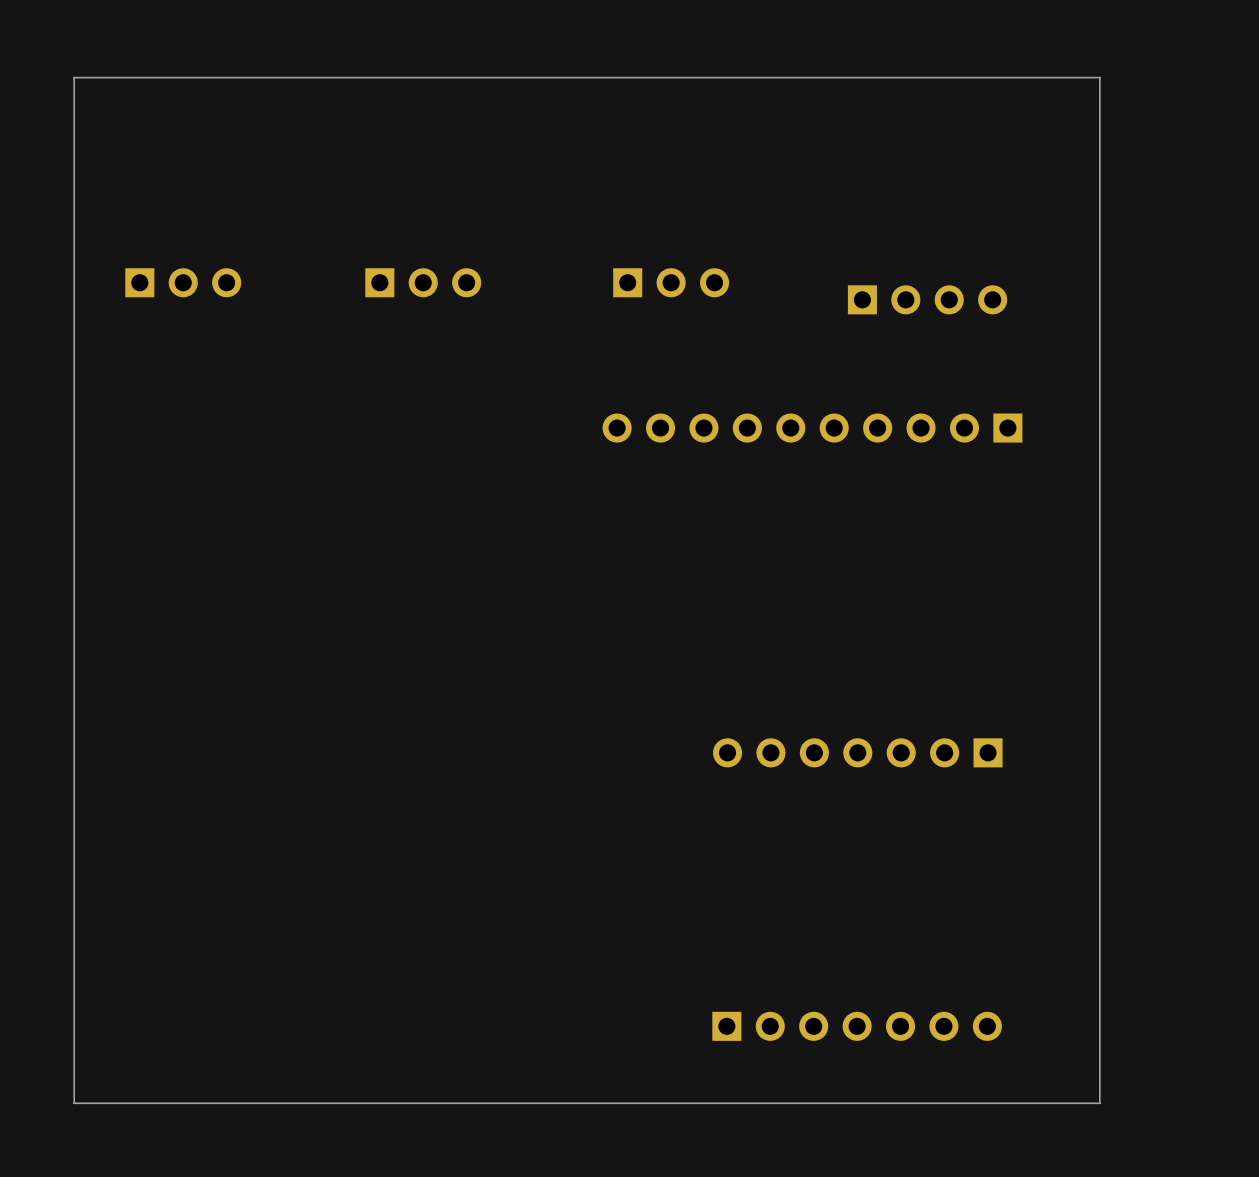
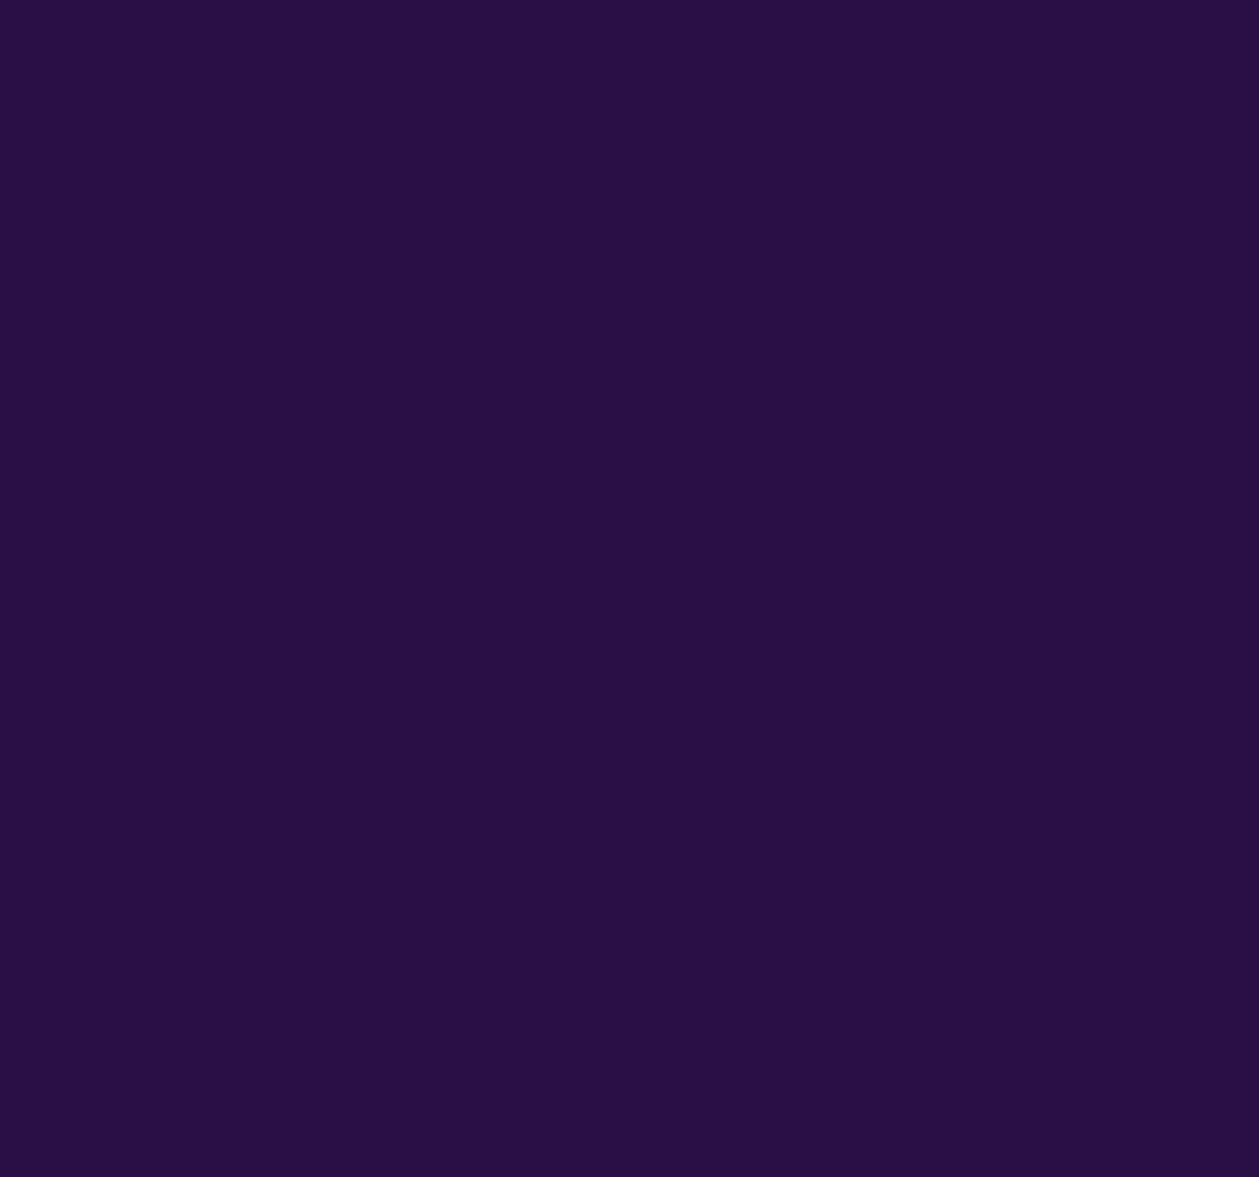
board edge: (1099, 77) (74, 77) (74, 1103) (1099, 1103) (1099, 77) -> none
part: (183, 282) -> none
part: (423, 282) -> none
part: (671, 282) -> none
part: (927, 299) -> none
part: (812, 428) -> none
part: (857, 752) -> none
part: (857, 1026) -> none

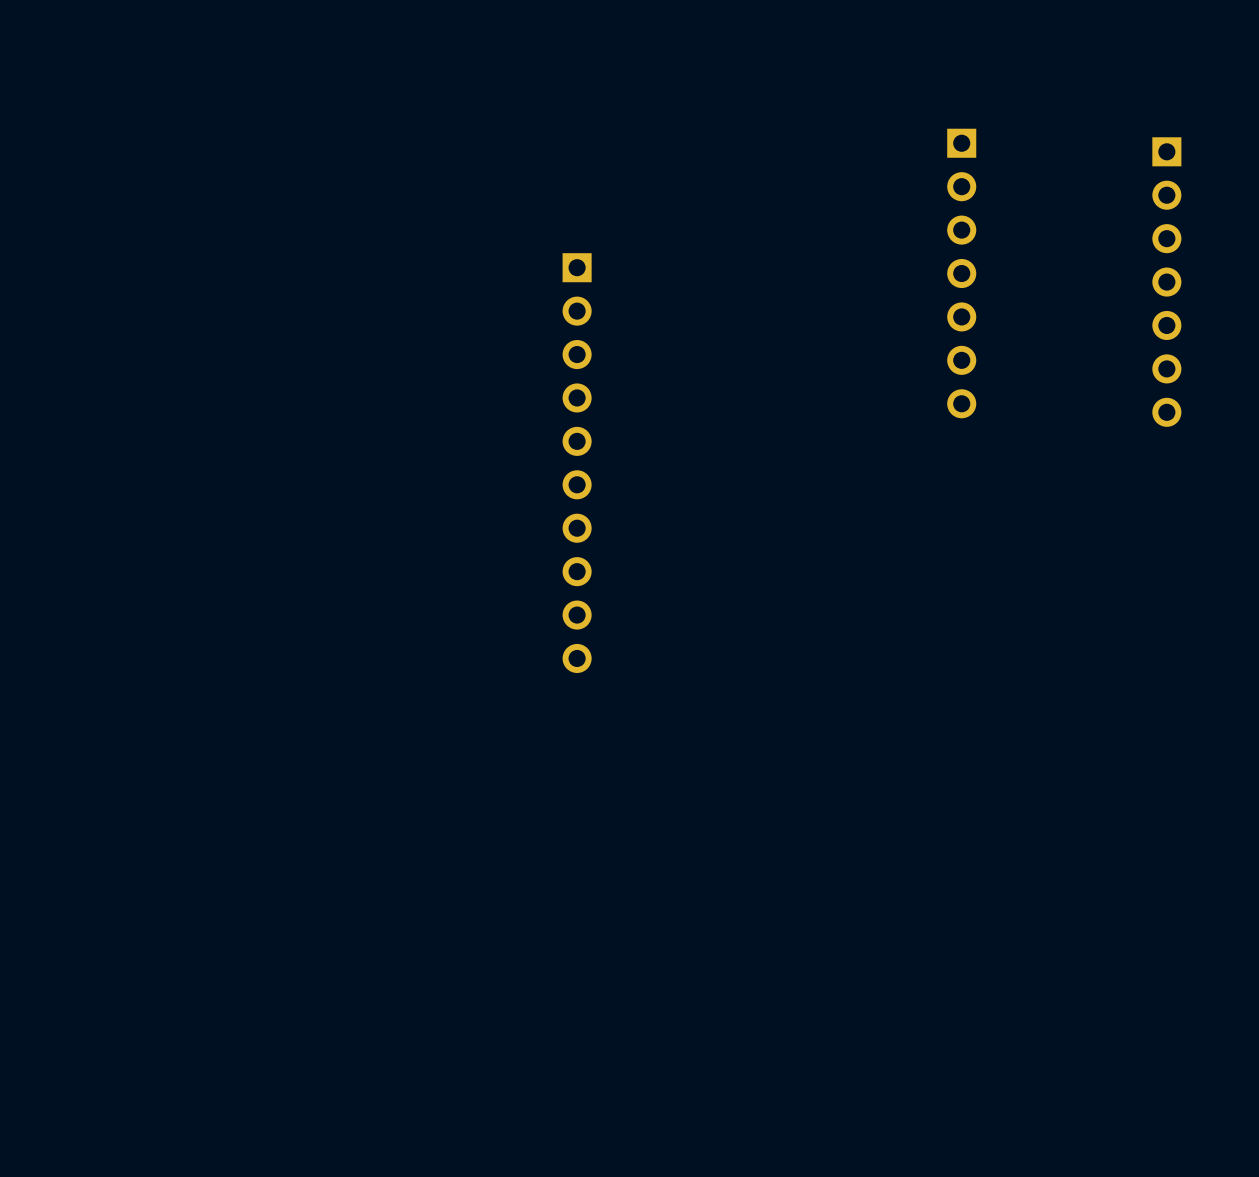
part: none -> (961, 273)
part: none -> (1166, 282)
part: none -> (577, 463)

